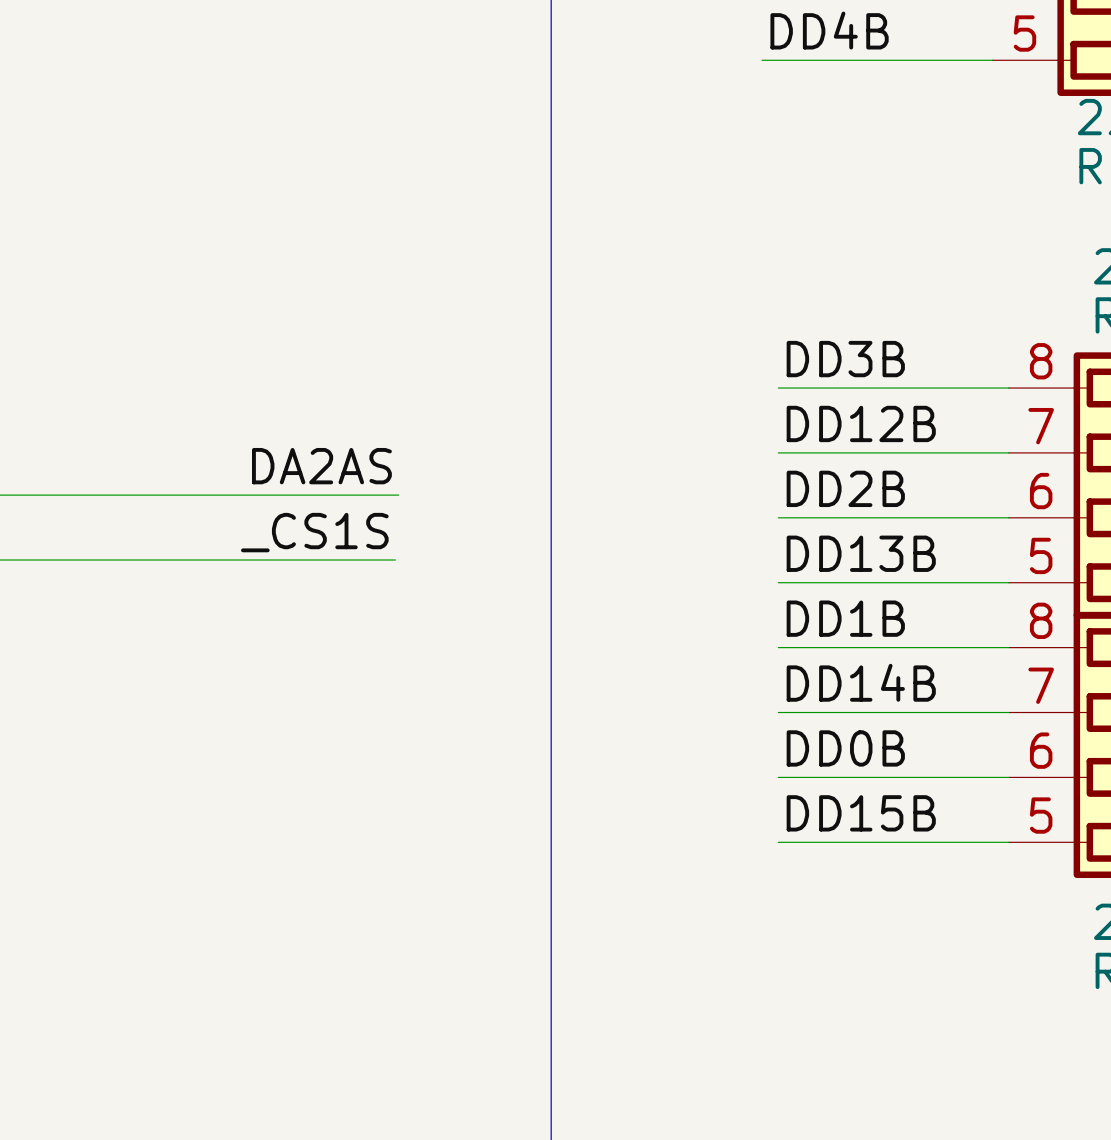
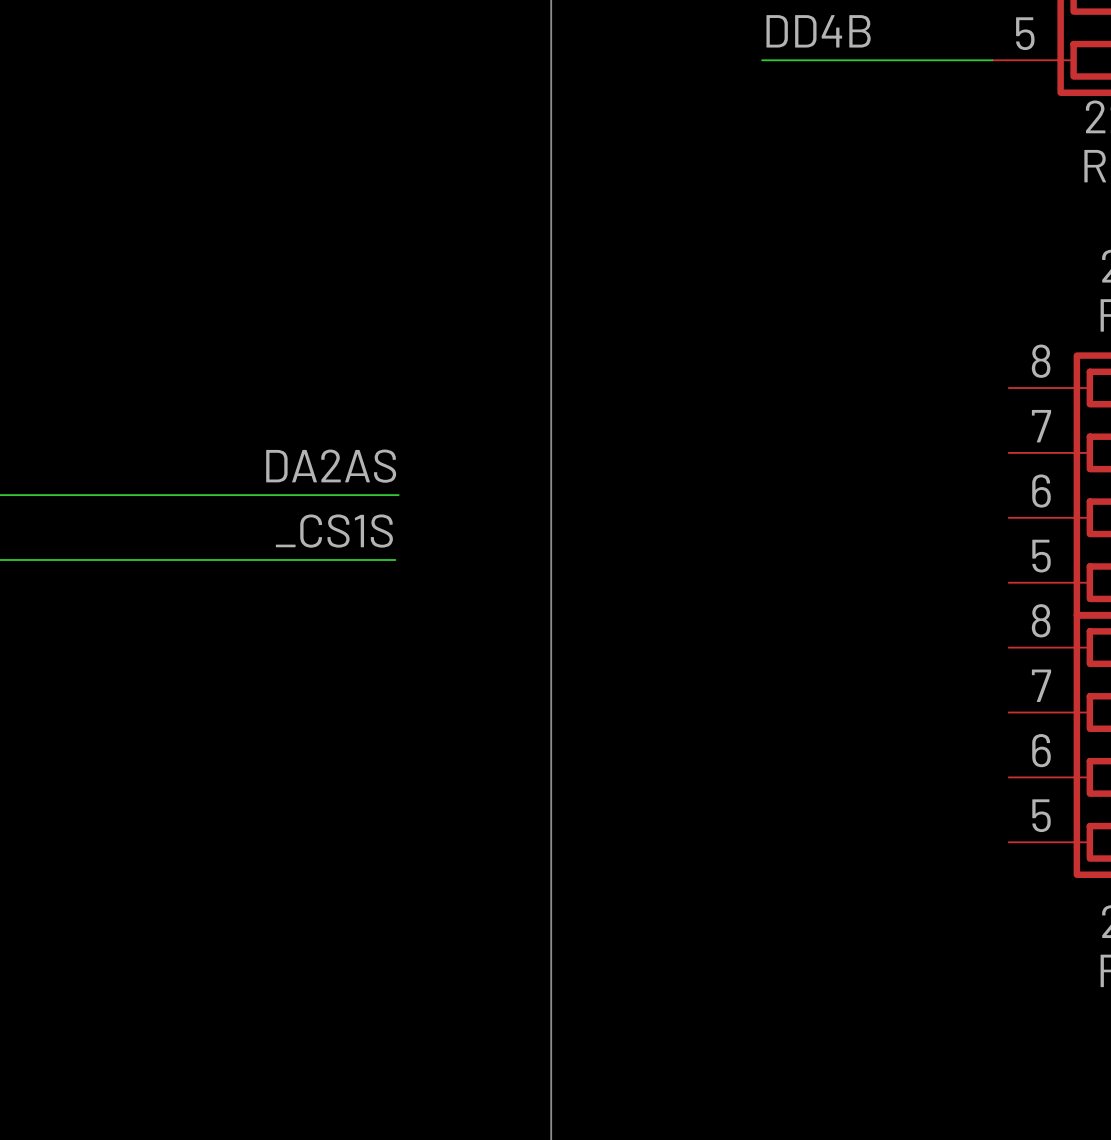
label: DD3B (845, 359) -> none
wire: (778, 388) (1008, 388) -> none
label: DD12B (861, 423) -> none
wire: (778, 452) (1008, 452) -> none
label: DD2B (845, 488) -> none
wire: (778, 517) (1008, 517) -> none
label: DD13B (861, 553) -> none
wire: (778, 582) (1008, 582) -> none
label: DD1B (845, 618) -> none
wire: (778, 647) (1008, 647) -> none
label: DD14B (861, 682) -> none
wire: (778, 712) (1008, 712) -> none
label: DD0B (845, 748) -> none
wire: (778, 777) (1008, 777) -> none
label: DD15B (861, 813) -> none
wire: (778, 842) (1008, 842) -> none

